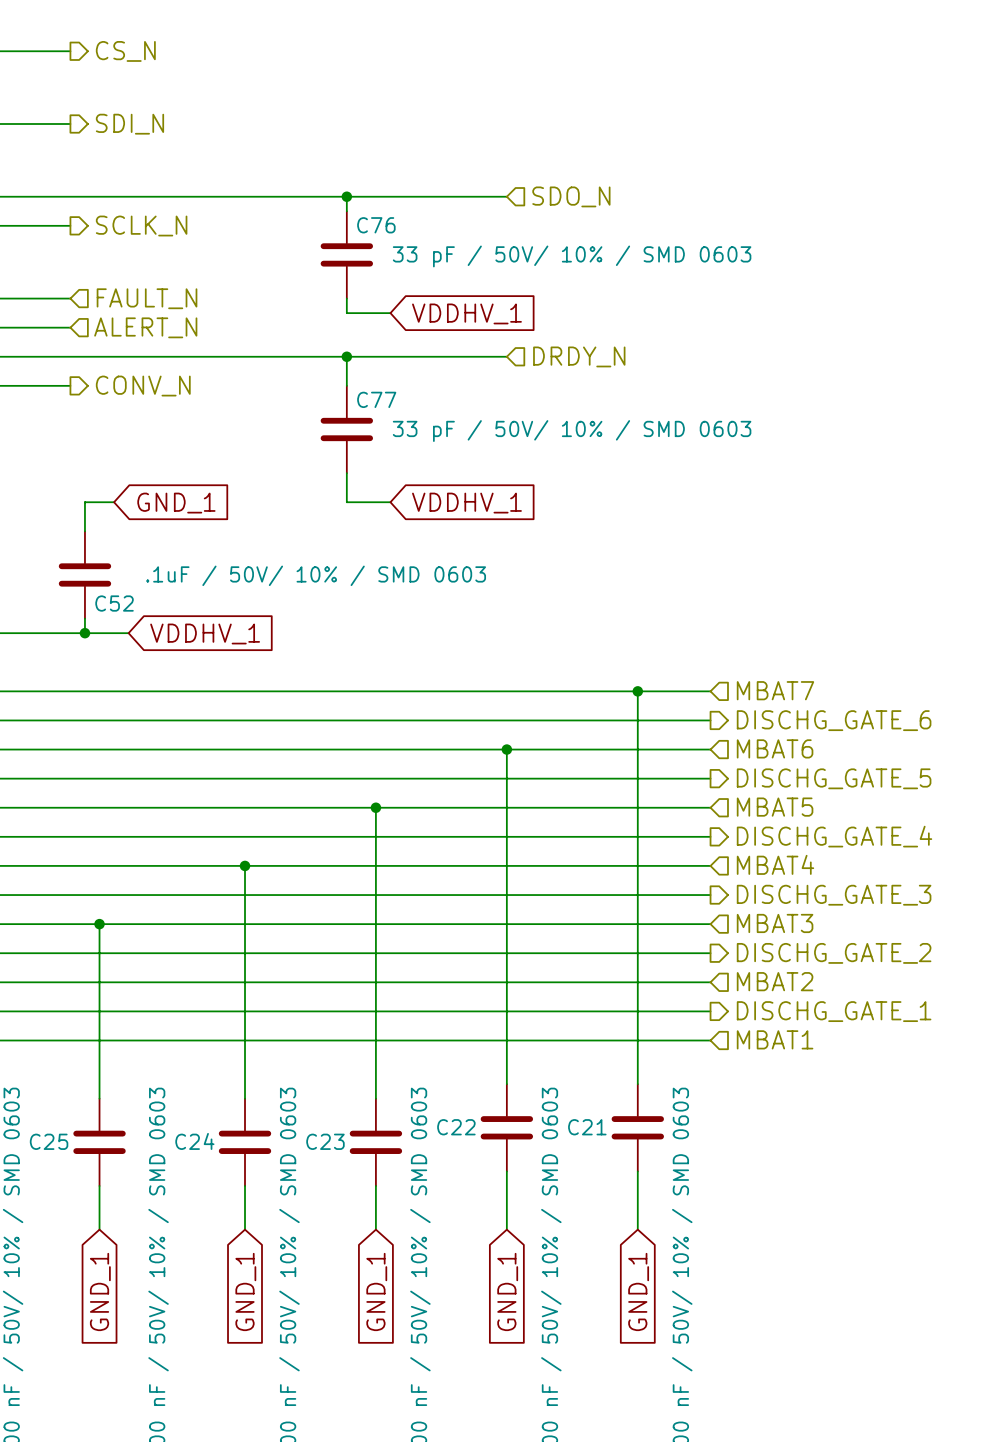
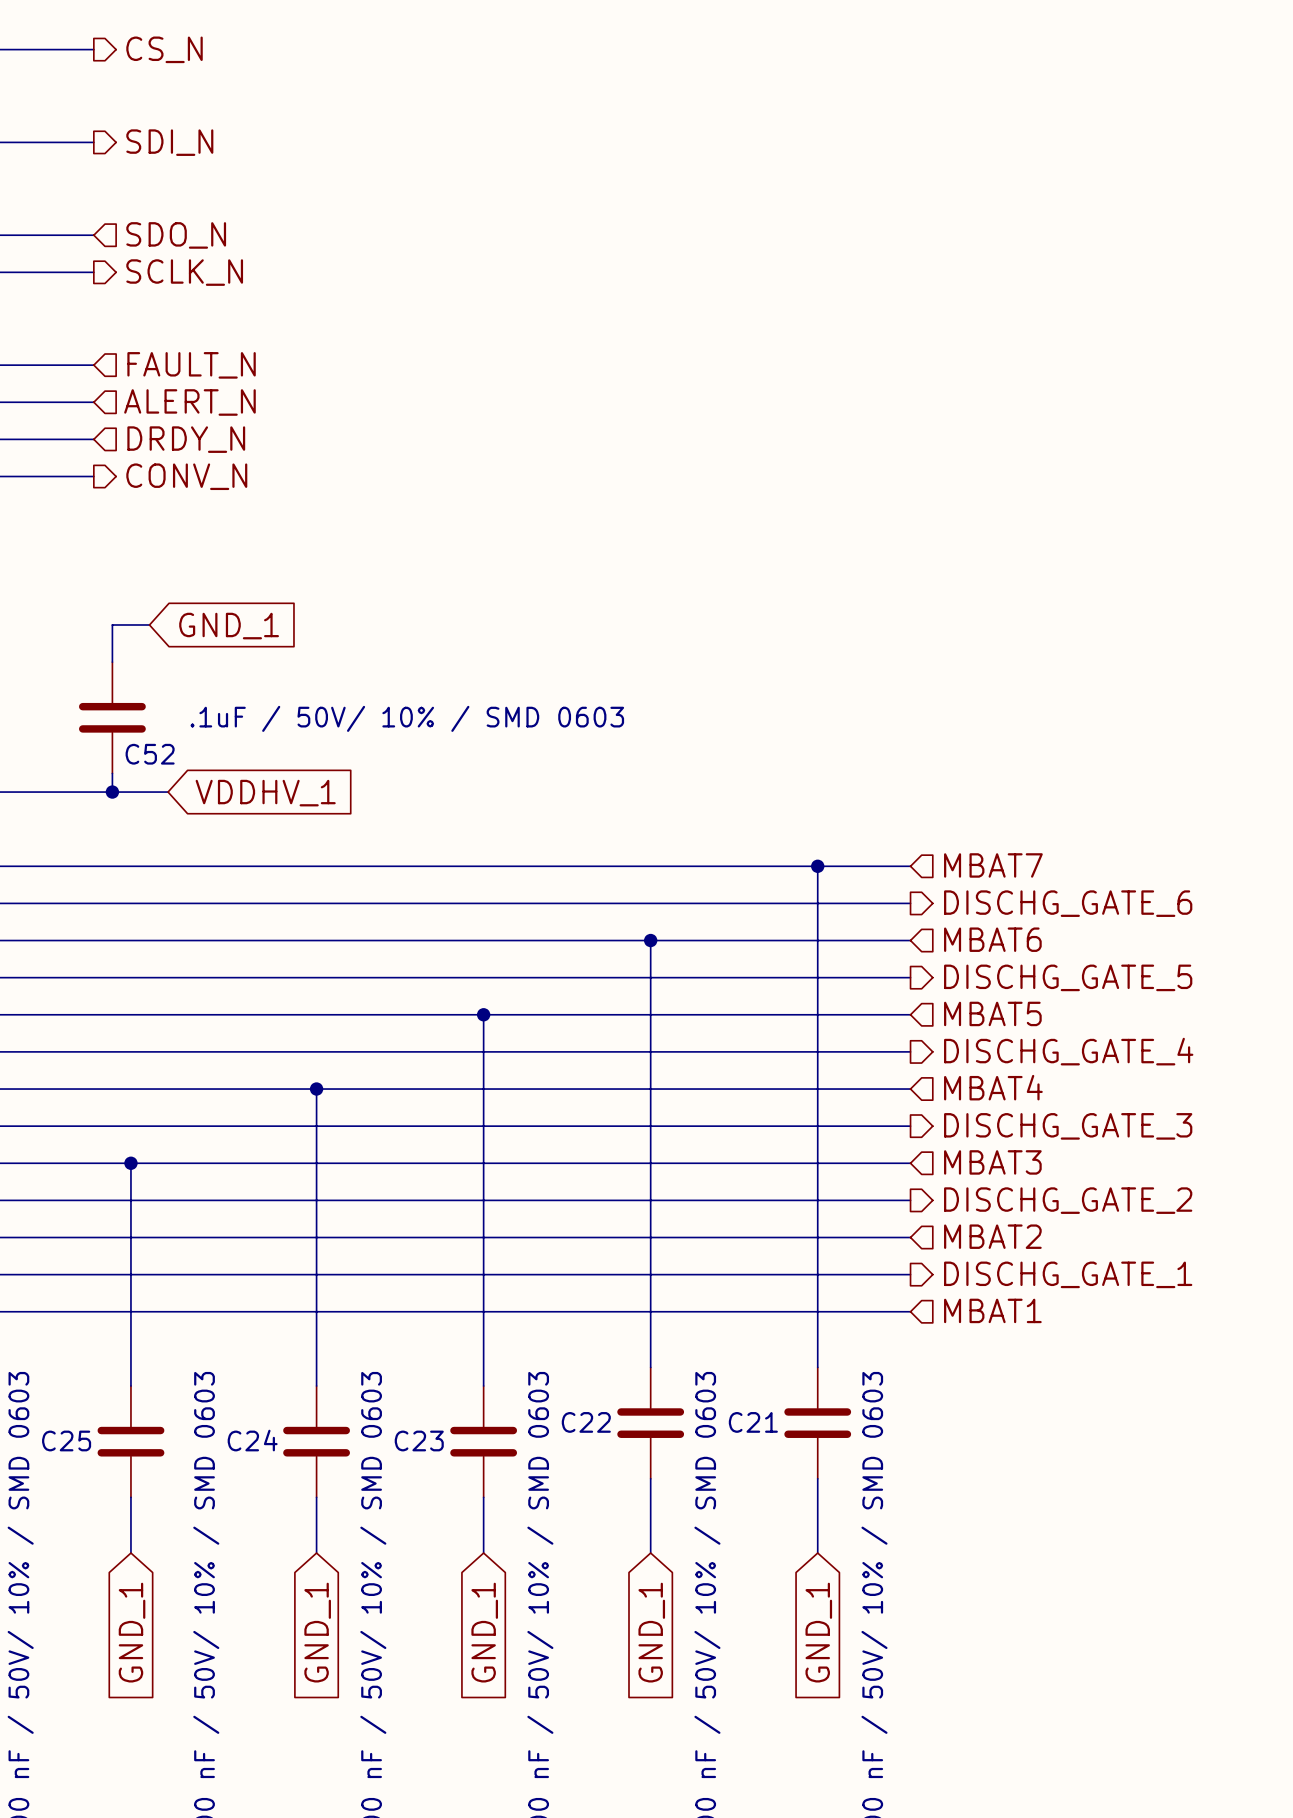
wire: (70, 196) (506, 196) -> none
hierarchical label: none -> SDO_N (176, 235)
wire: (346, 196) (346, 211) -> none
junction: (346, 196) -> none
hierarchical label: SDO_N (571, 196) -> none
C76: 33 pF / 50V/ 10% / SMD 0603 (346, 254) -> none
wire: (346, 298) (346, 313) (390, 313) -> none
global label: VDDHV_1 (466, 313) -> none
wire: (70, 356) (506, 356) -> none
hierarchical label: none -> DRDY_N (186, 439)
wire: (346, 356) (346, 385) -> none
junction: (346, 356) -> none
hierarchical label: DRDY_N (579, 356) -> none
C77: 33 pF / 50V/ 10% / SMD 0603 (346, 429) -> none
wire: (346, 473) (346, 502) (390, 502) -> none
global label: VDDHV_1 (466, 503) -> none

